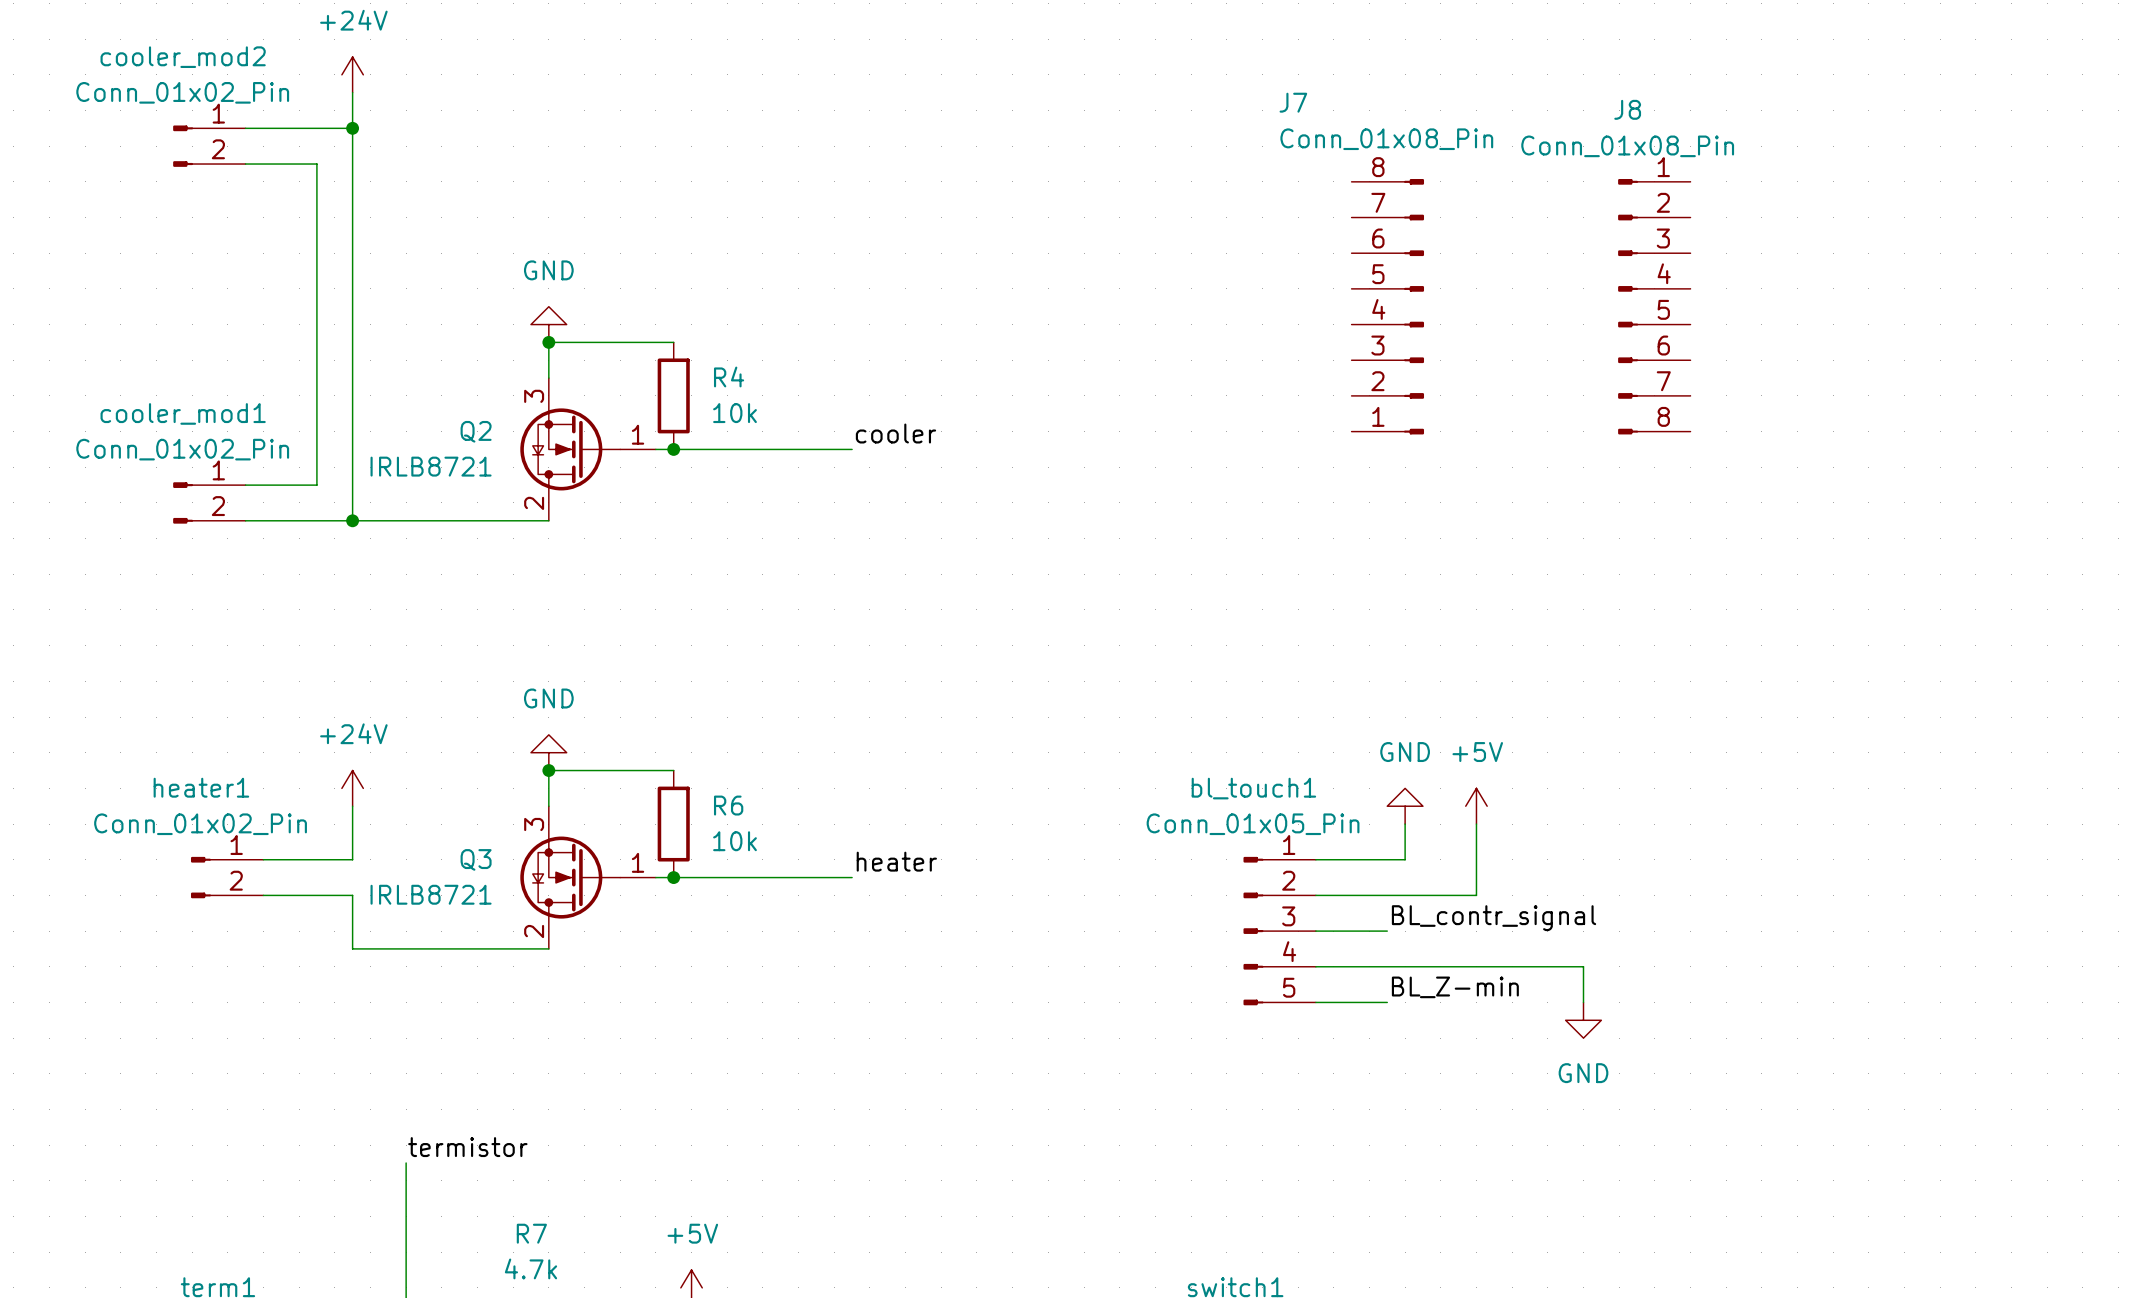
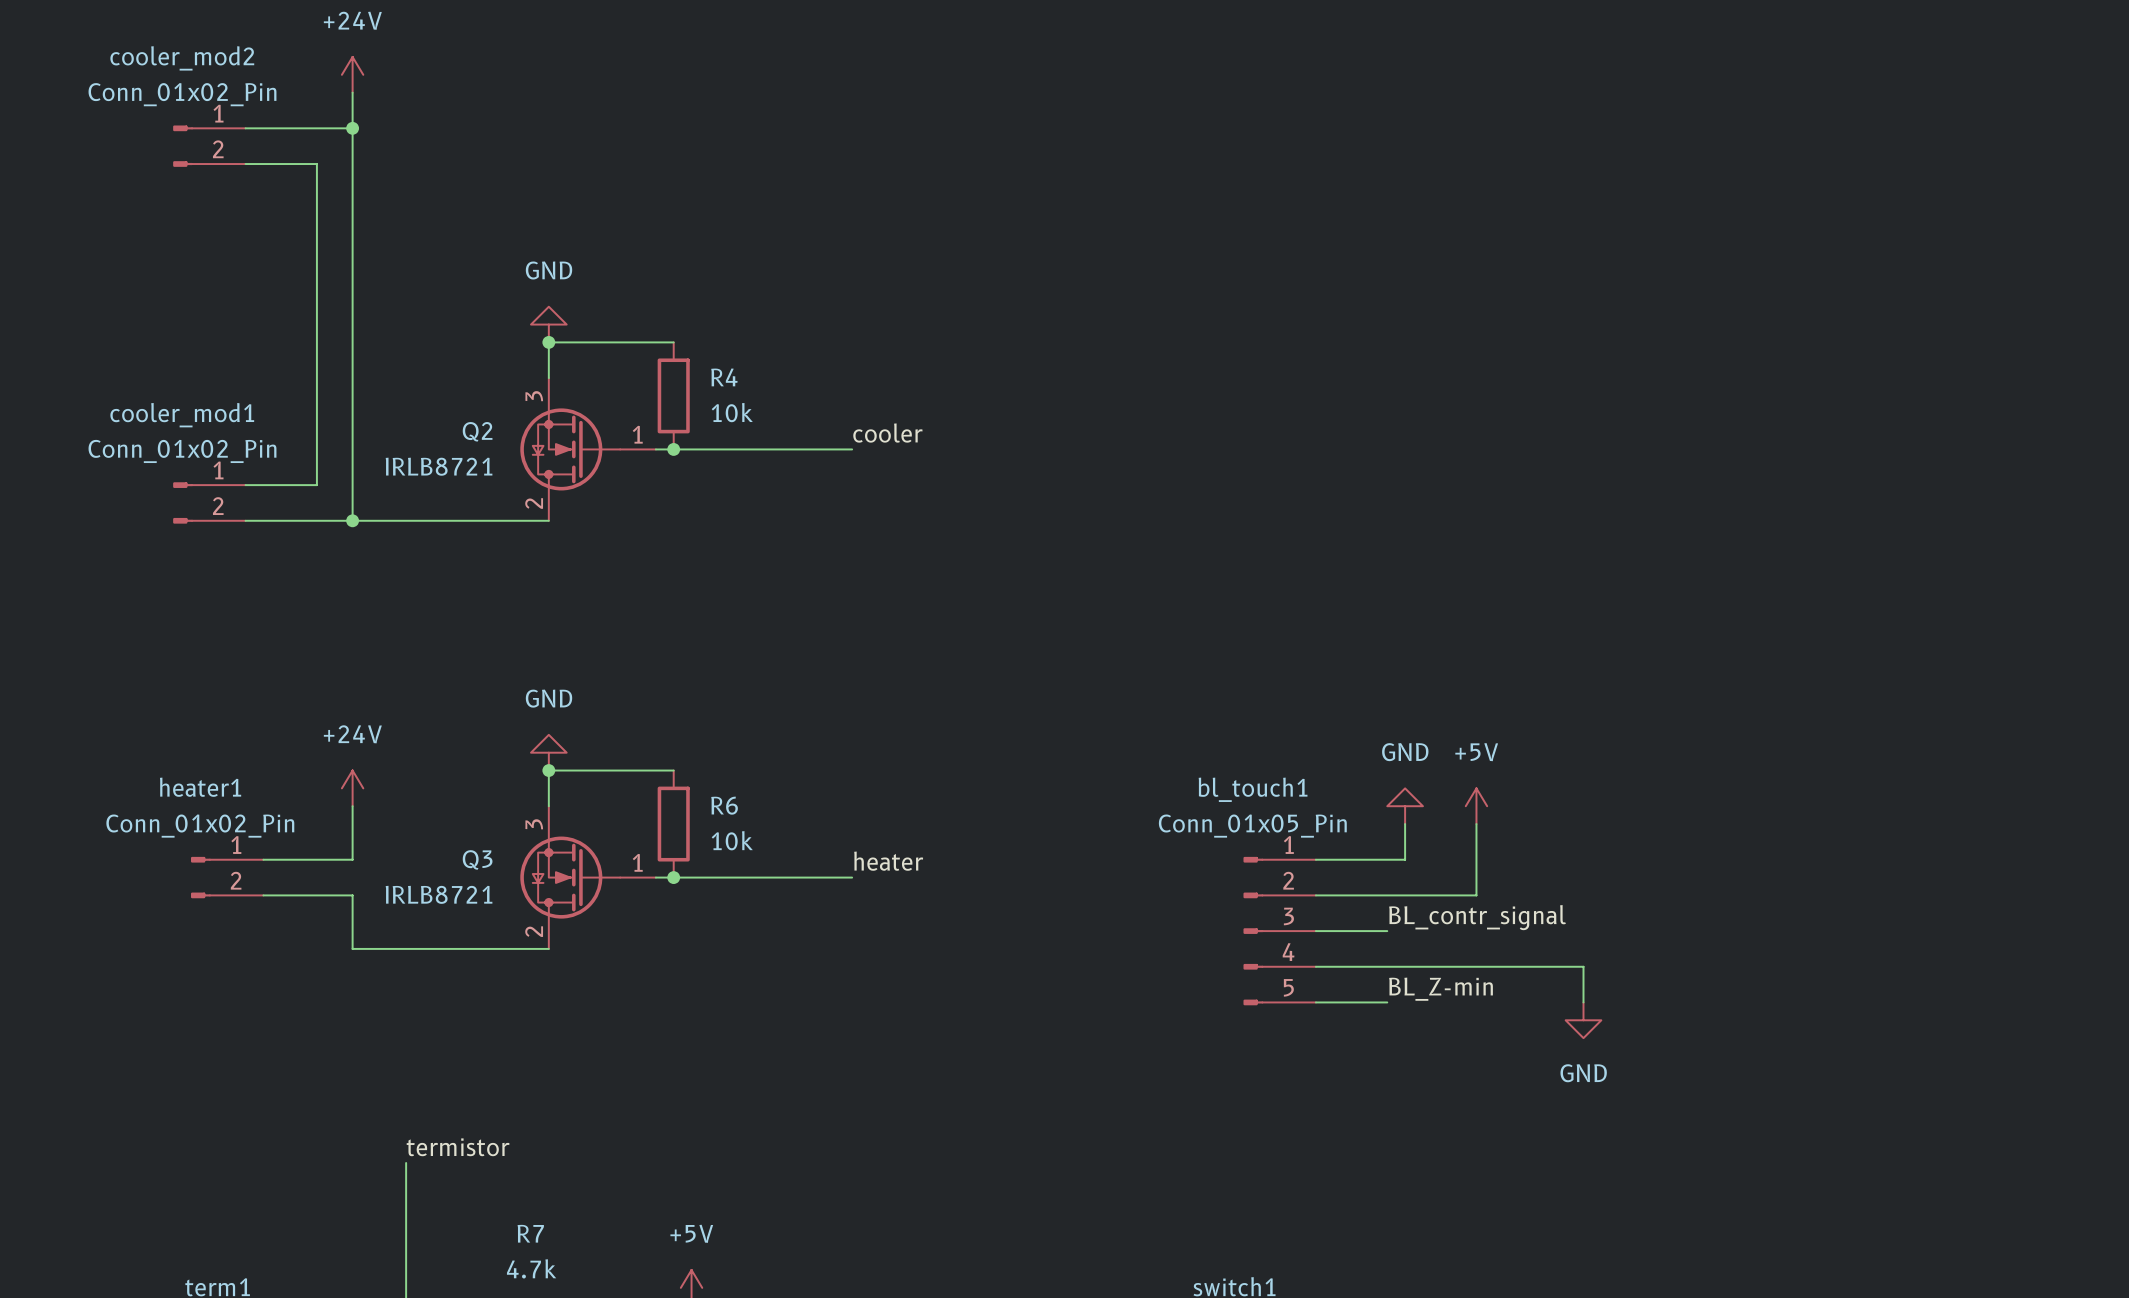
J7: Conn_01x08_Pin (1387, 306) -> none
J8: Conn_01x08_Pin (1654, 306) -> none

